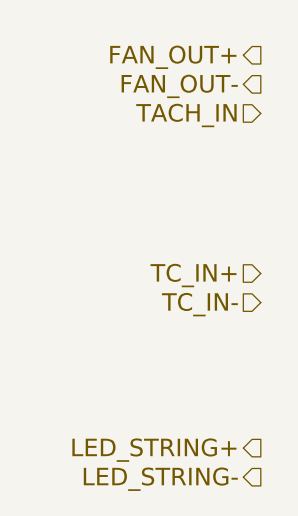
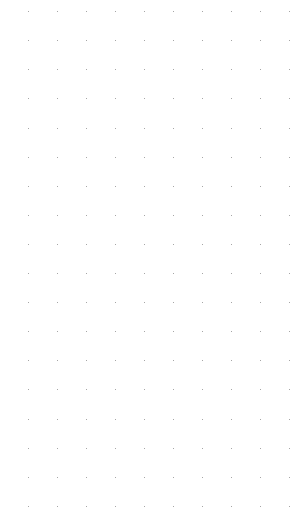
hierarchical label: FAN_OUT+ (173, 57) -> none
hierarchical label: FAN_OUT- (179, 86) -> none
hierarchical label: TACH_IN (186, 115) -> none
hierarchical label: TC_IN+ (193, 275) -> none
hierarchical label: TC_IN- (199, 304) -> none
hierarchical label: LED_STRING+ (154, 450) -> none
hierarchical label: LED_STRING- (160, 479) -> none

